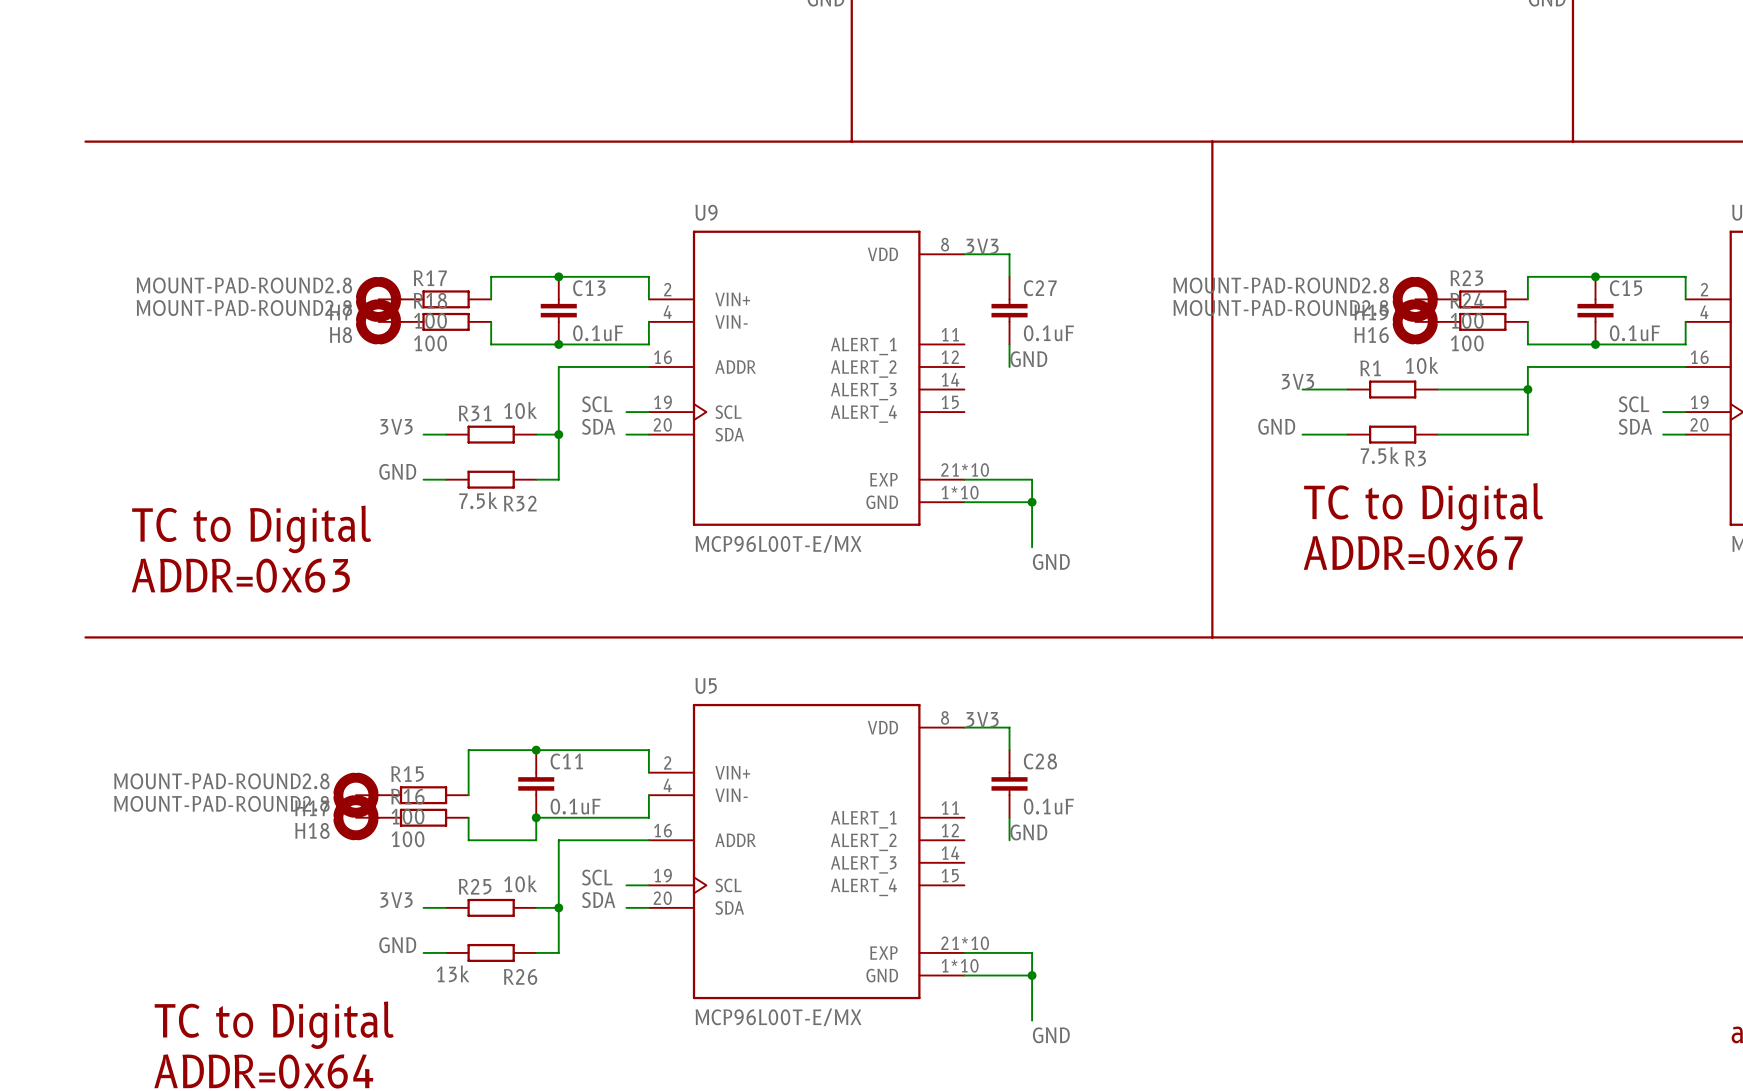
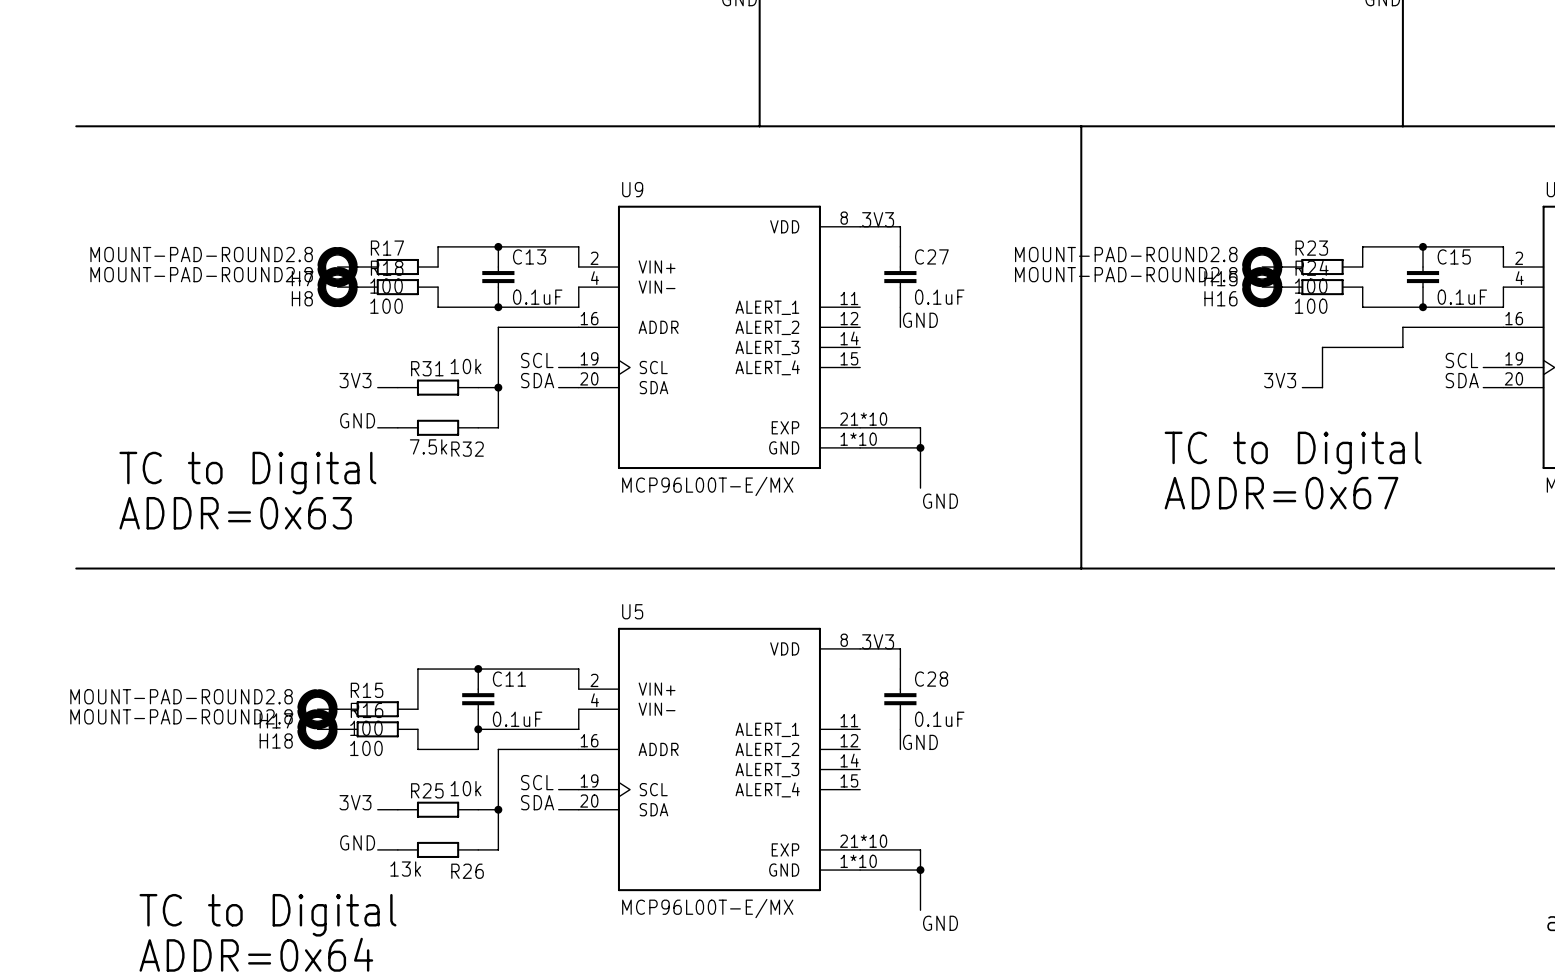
wire: (1572, 366) (1527, 366) (1527, 434) (1482, 434) -> (1402, 327) (1402, 347) (1362, 347)
label position: 3V3 (1298, 381) -> 3V3 (1280, 380)
wire: (1302, 389) (1347, 389) -> none
R1: 10k (1392, 389) -> none
wire: (1437, 389) (1482, 389) -> (1322, 387) (1322, 347)
junction: (1527, 389) -> none
label: GND (1276, 426) -> none
wire: (1302, 434) (1347, 434) -> none
R3: 7.5k (1392, 434) -> none
wire: (1437, 434) (1460, 434) -> none

